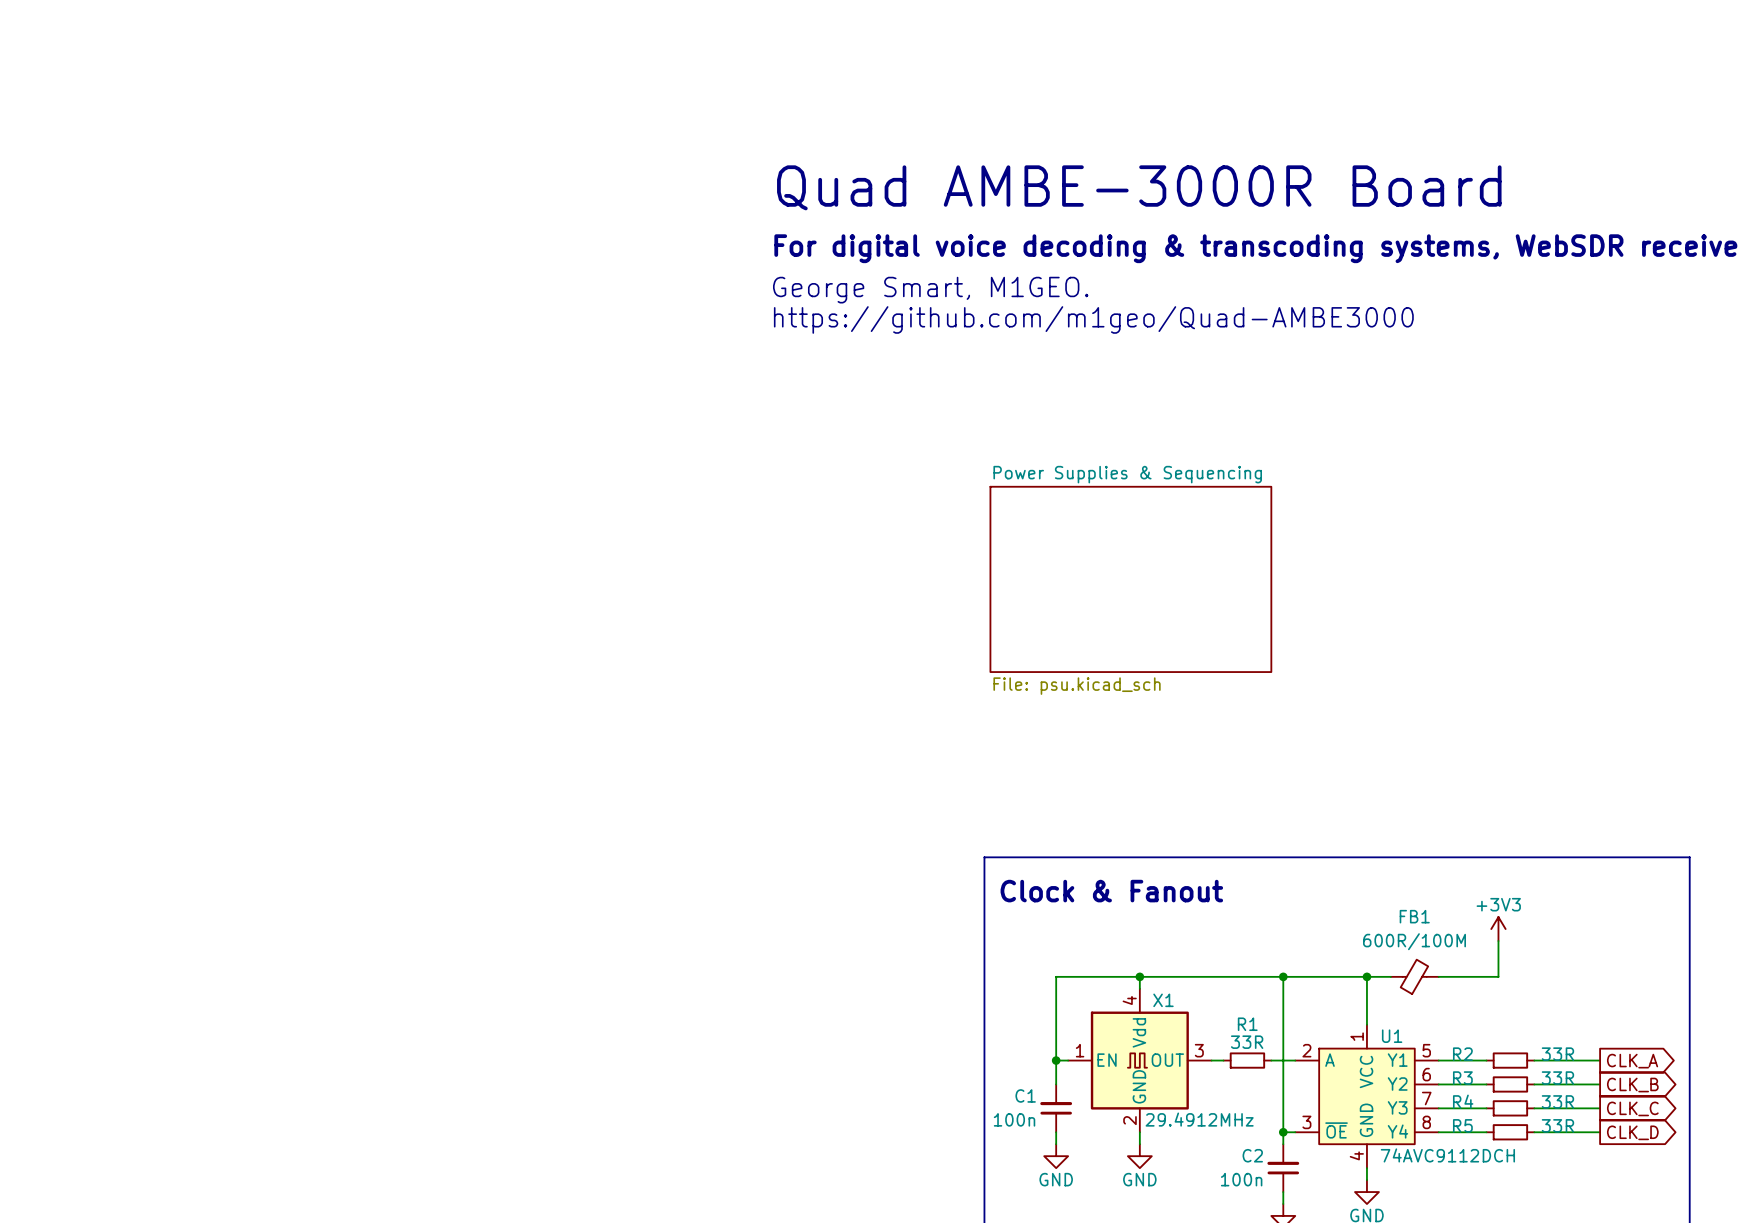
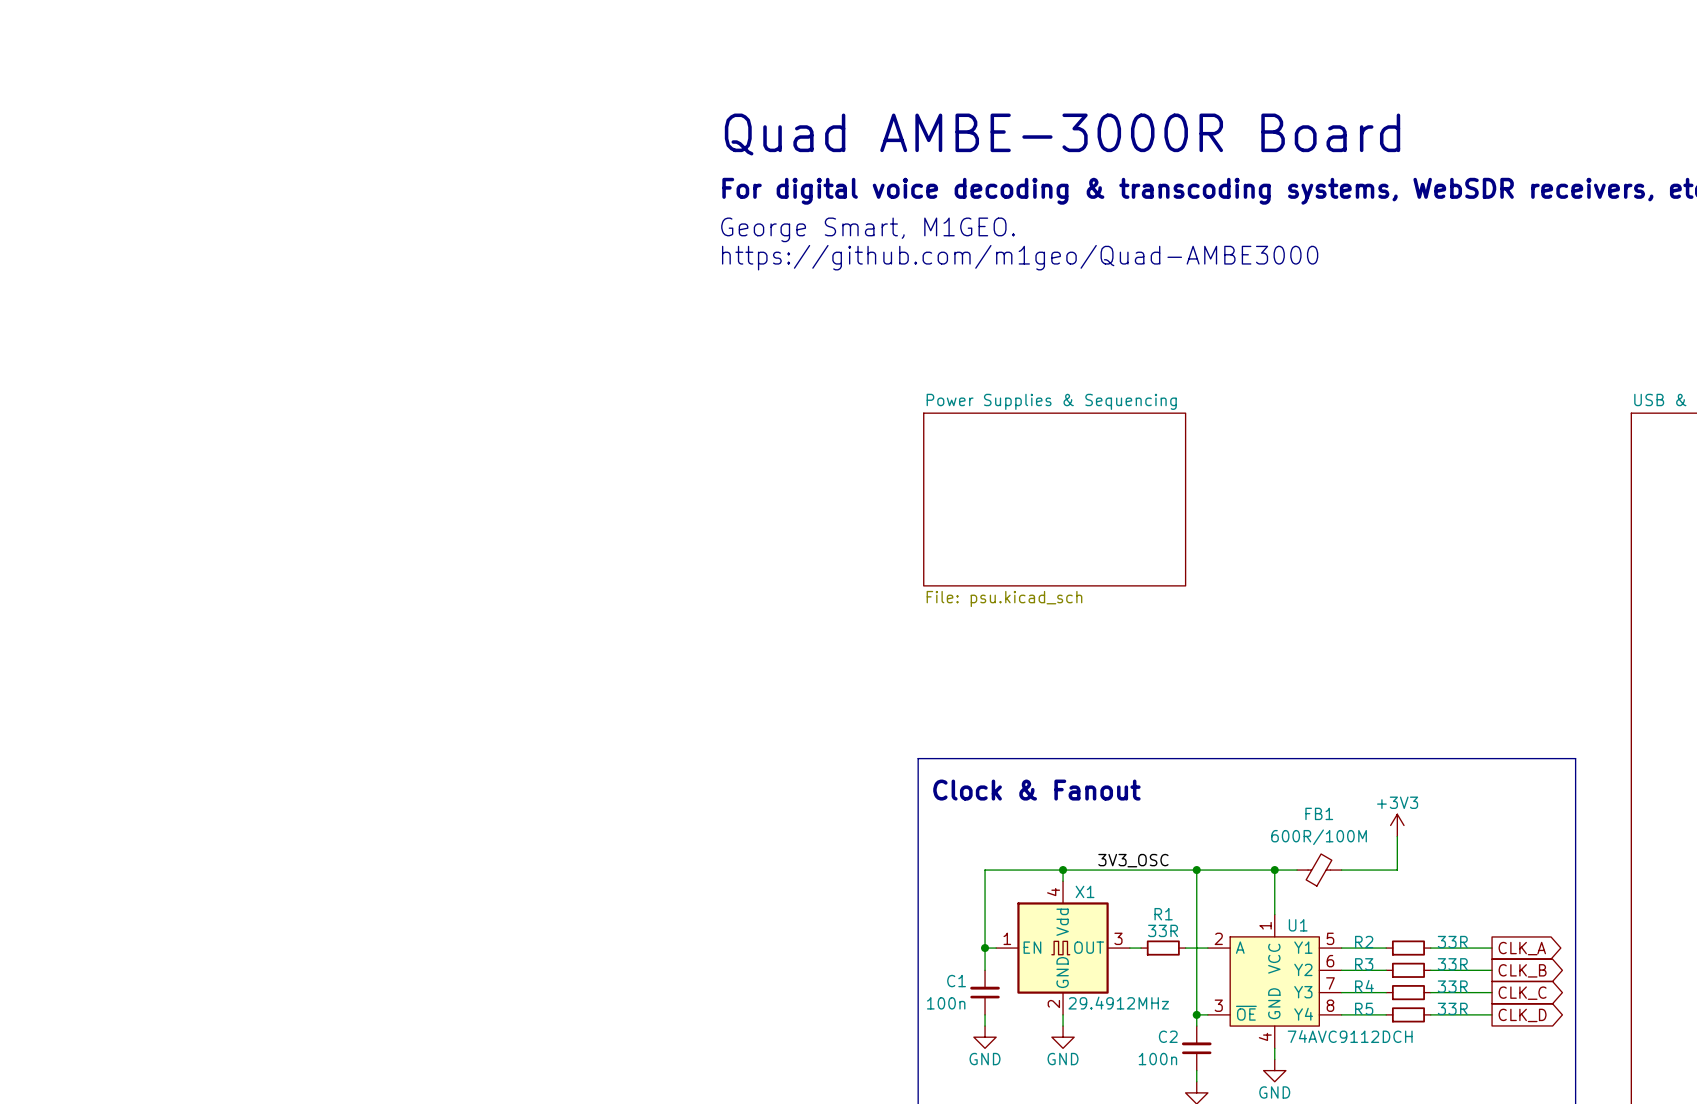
label: none -> 3V3_OSC (1133, 860)

